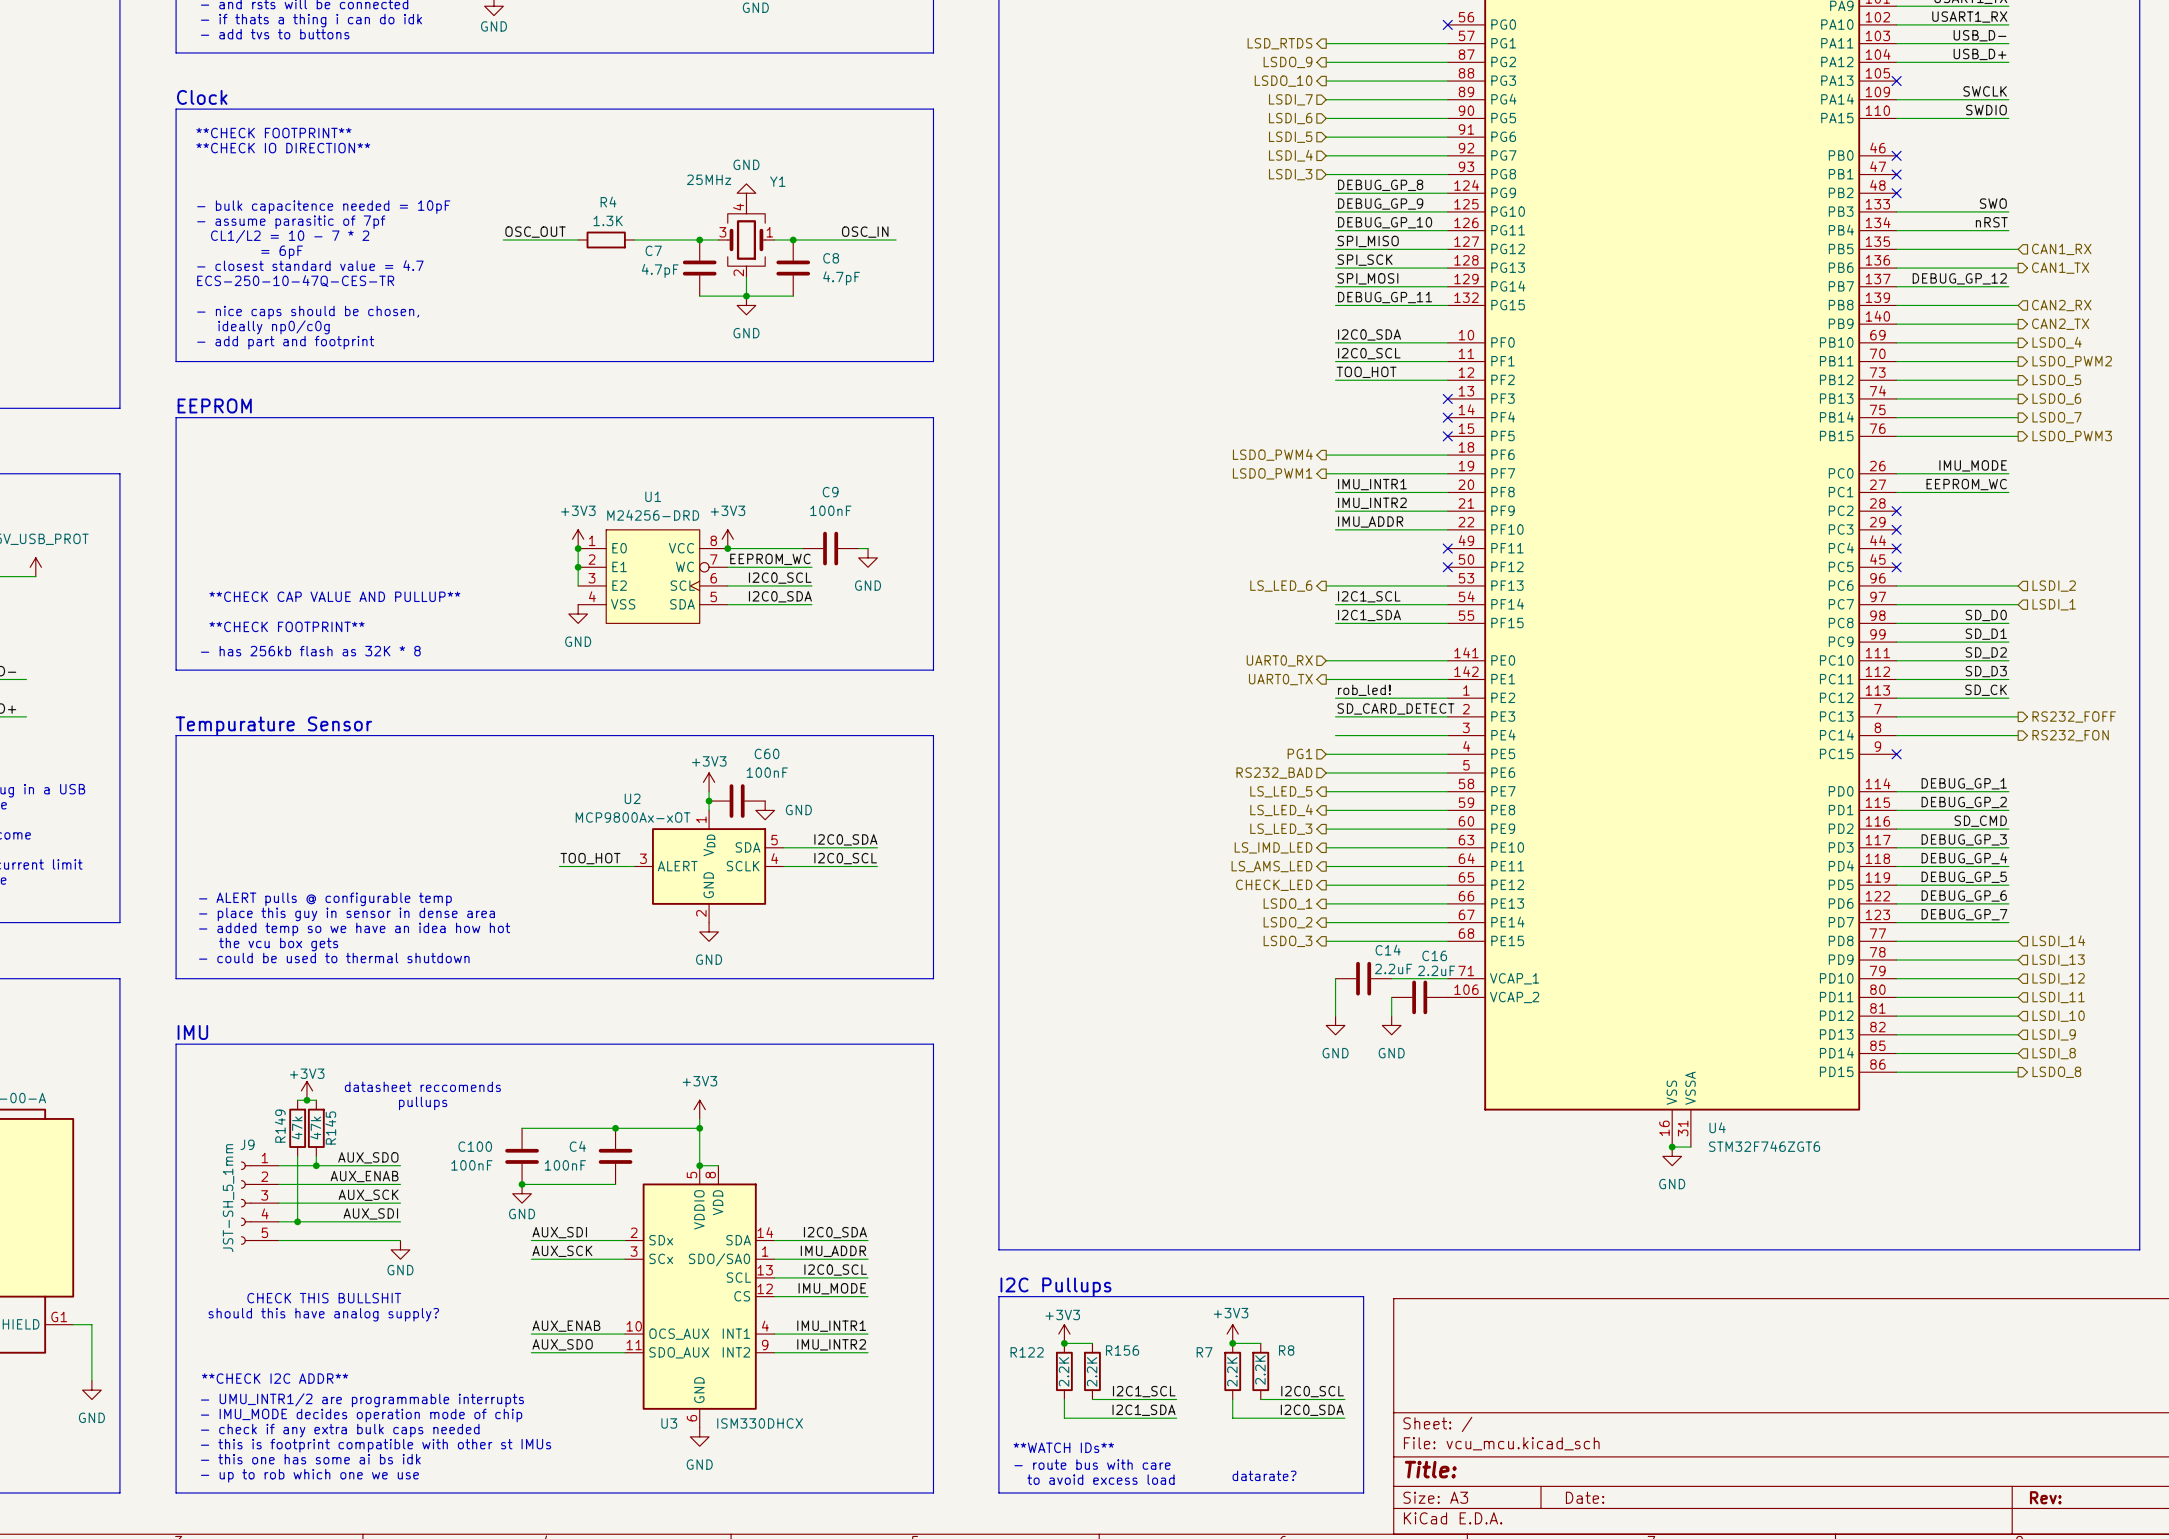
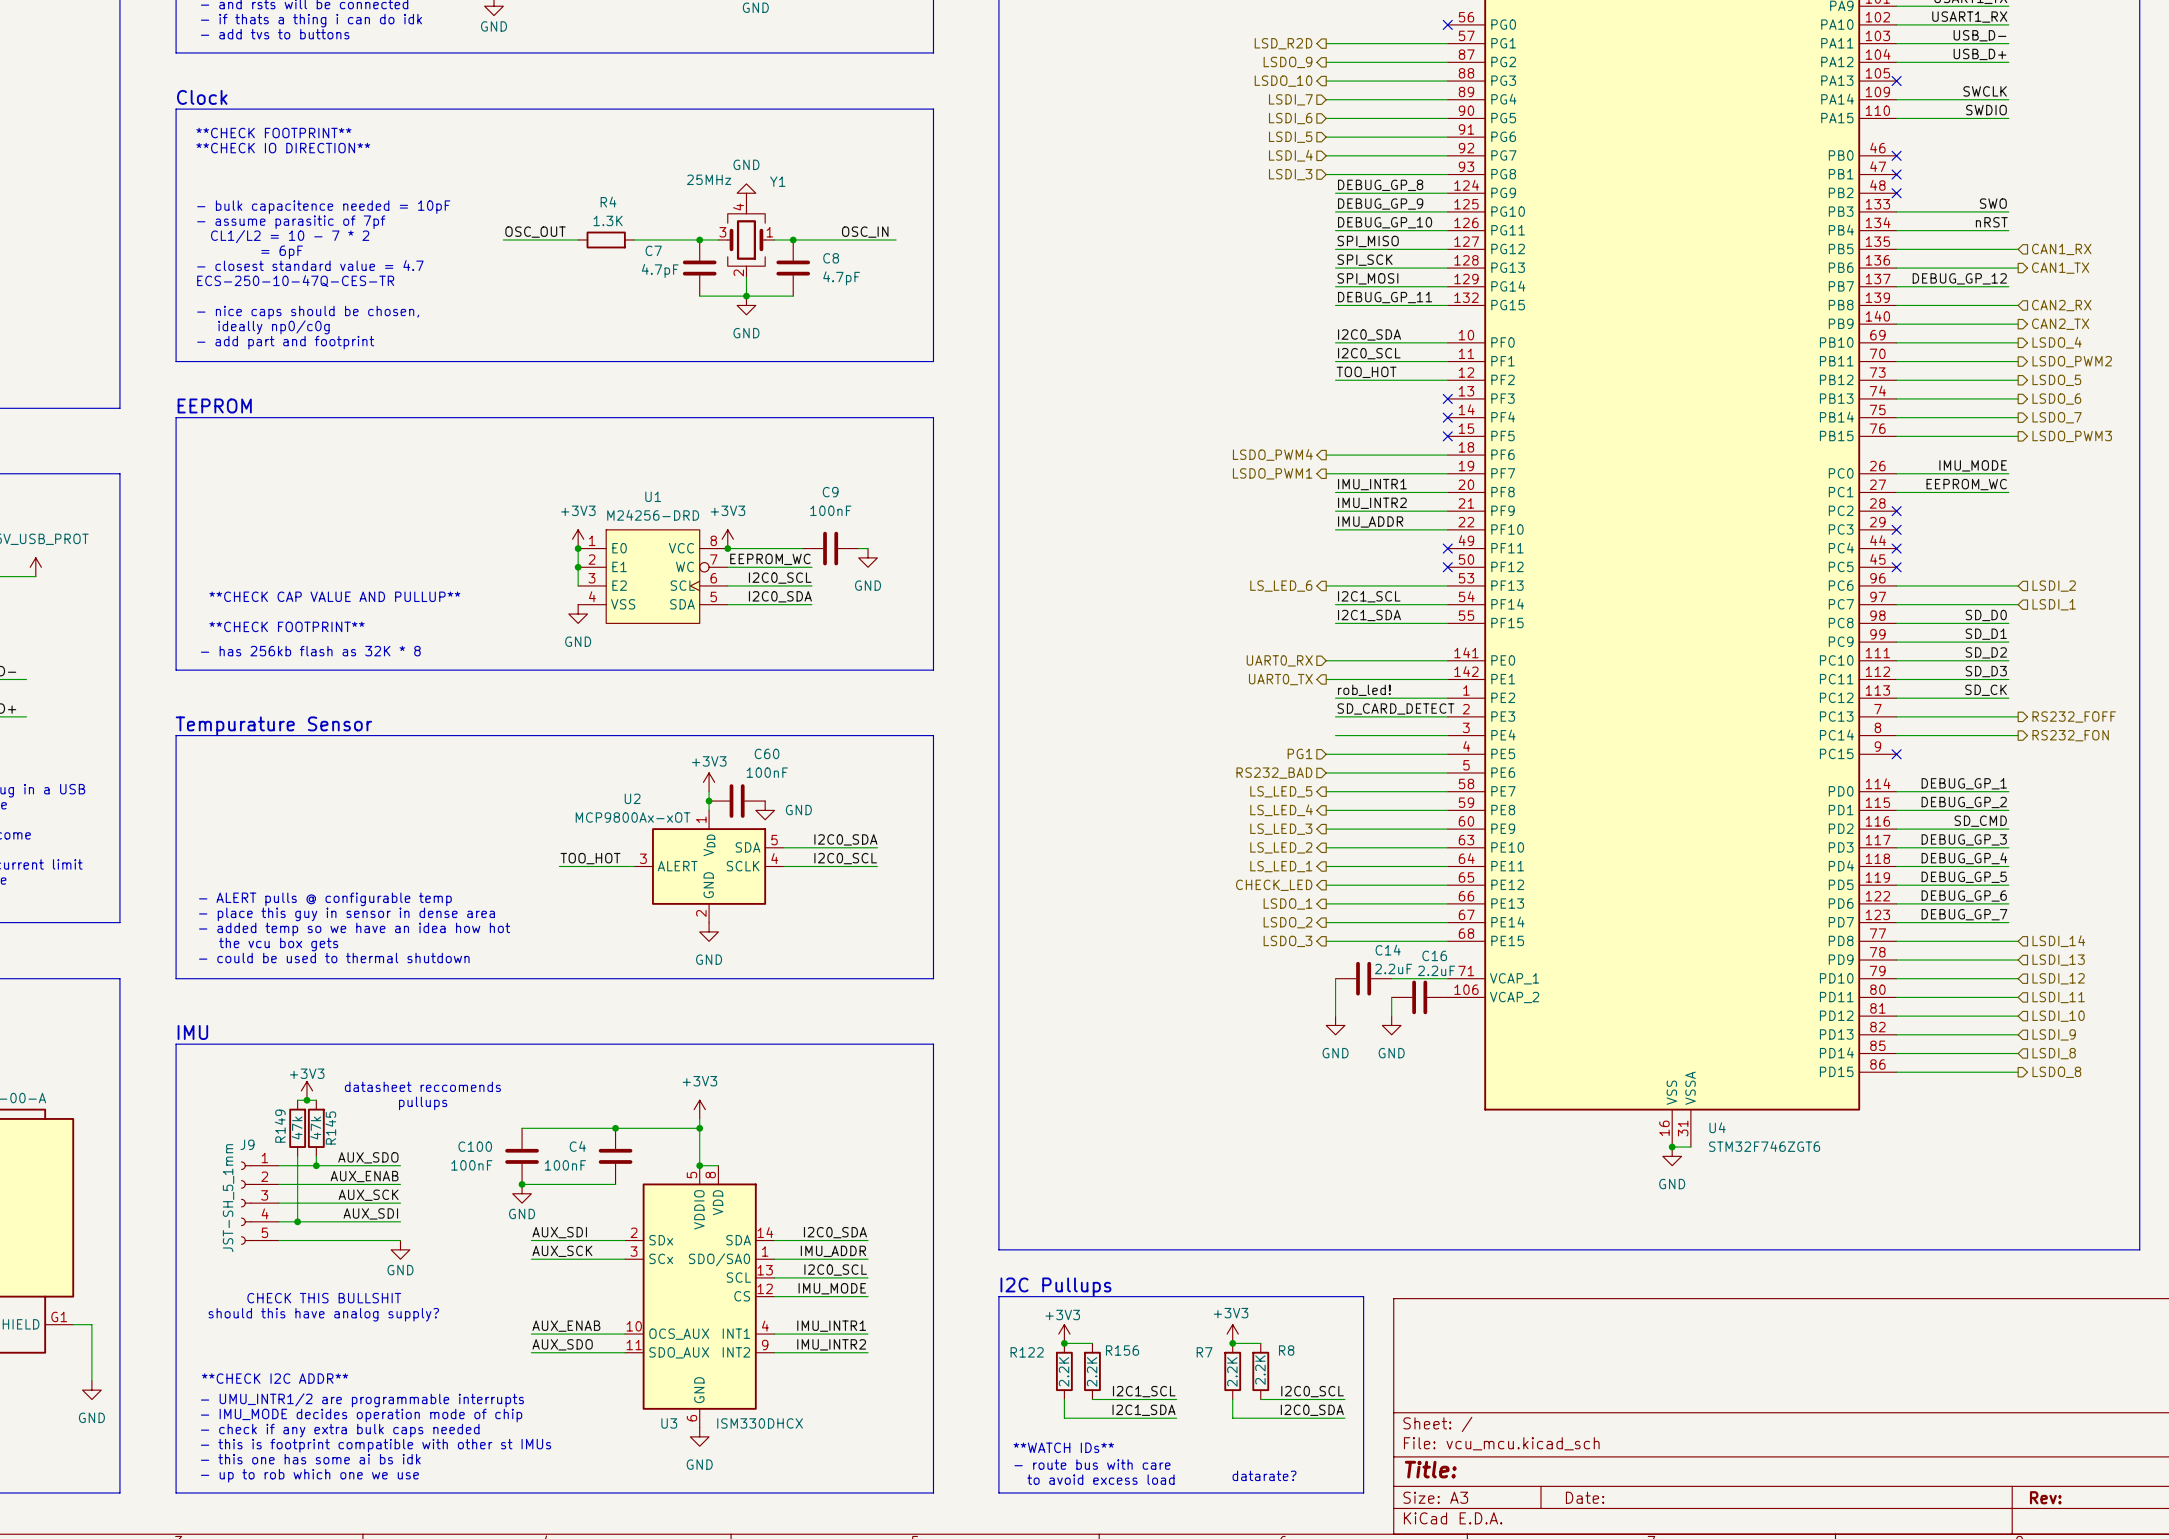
hierarchical label: LSD_RTDS (1279, 43) -> LSD_R2D (1283, 43)
hierarchical label: LS_IMD_LED (1273, 847) -> LS_LED_2 (1281, 847)
hierarchical label: LS_AMS_LED (1271, 866) -> LS_LED_1 (1281, 866)

